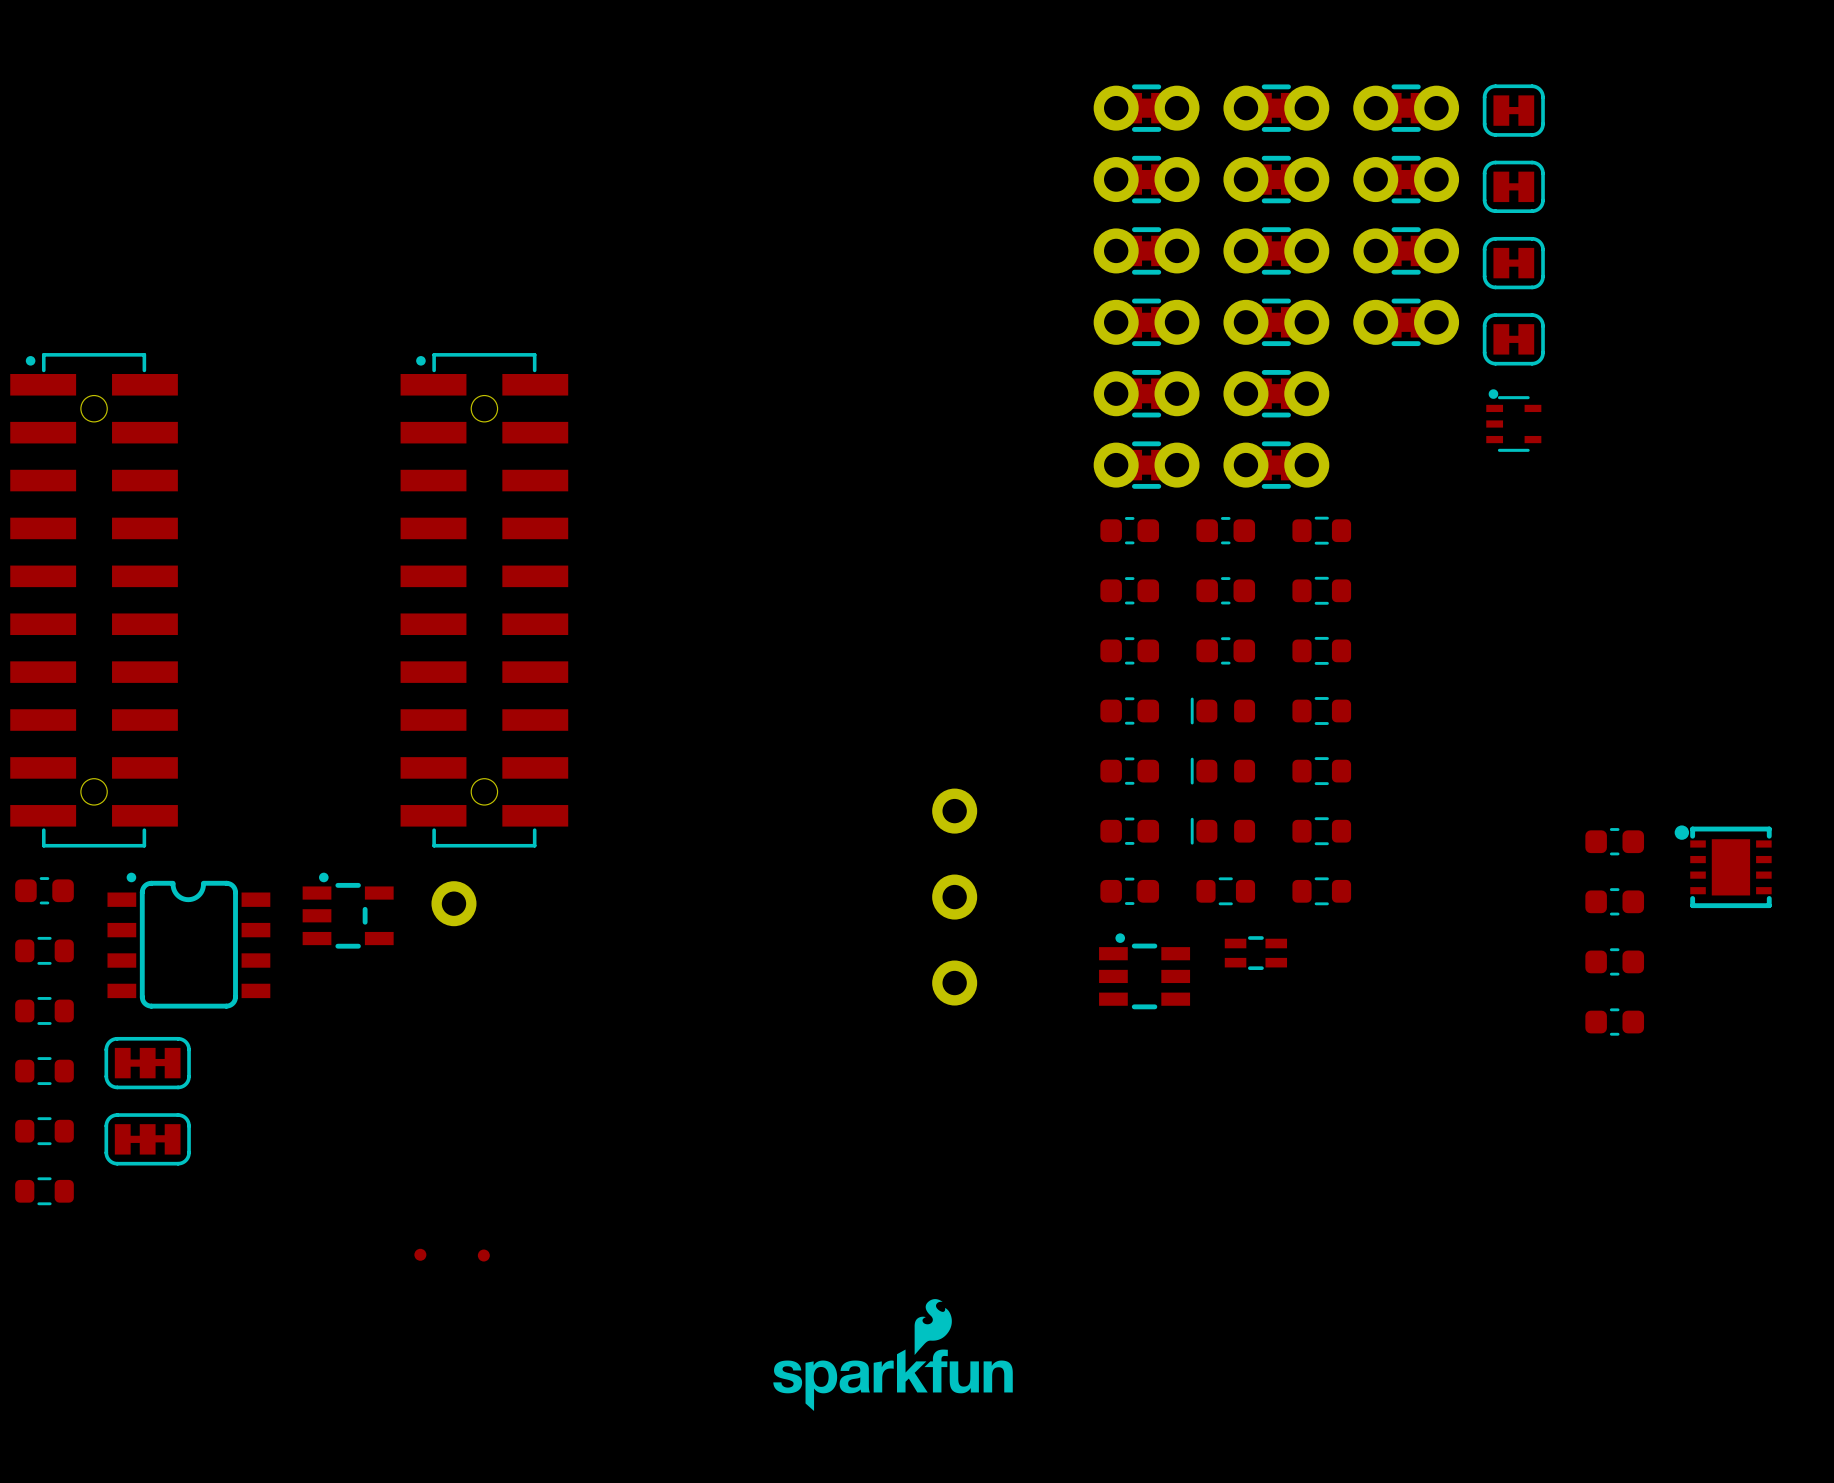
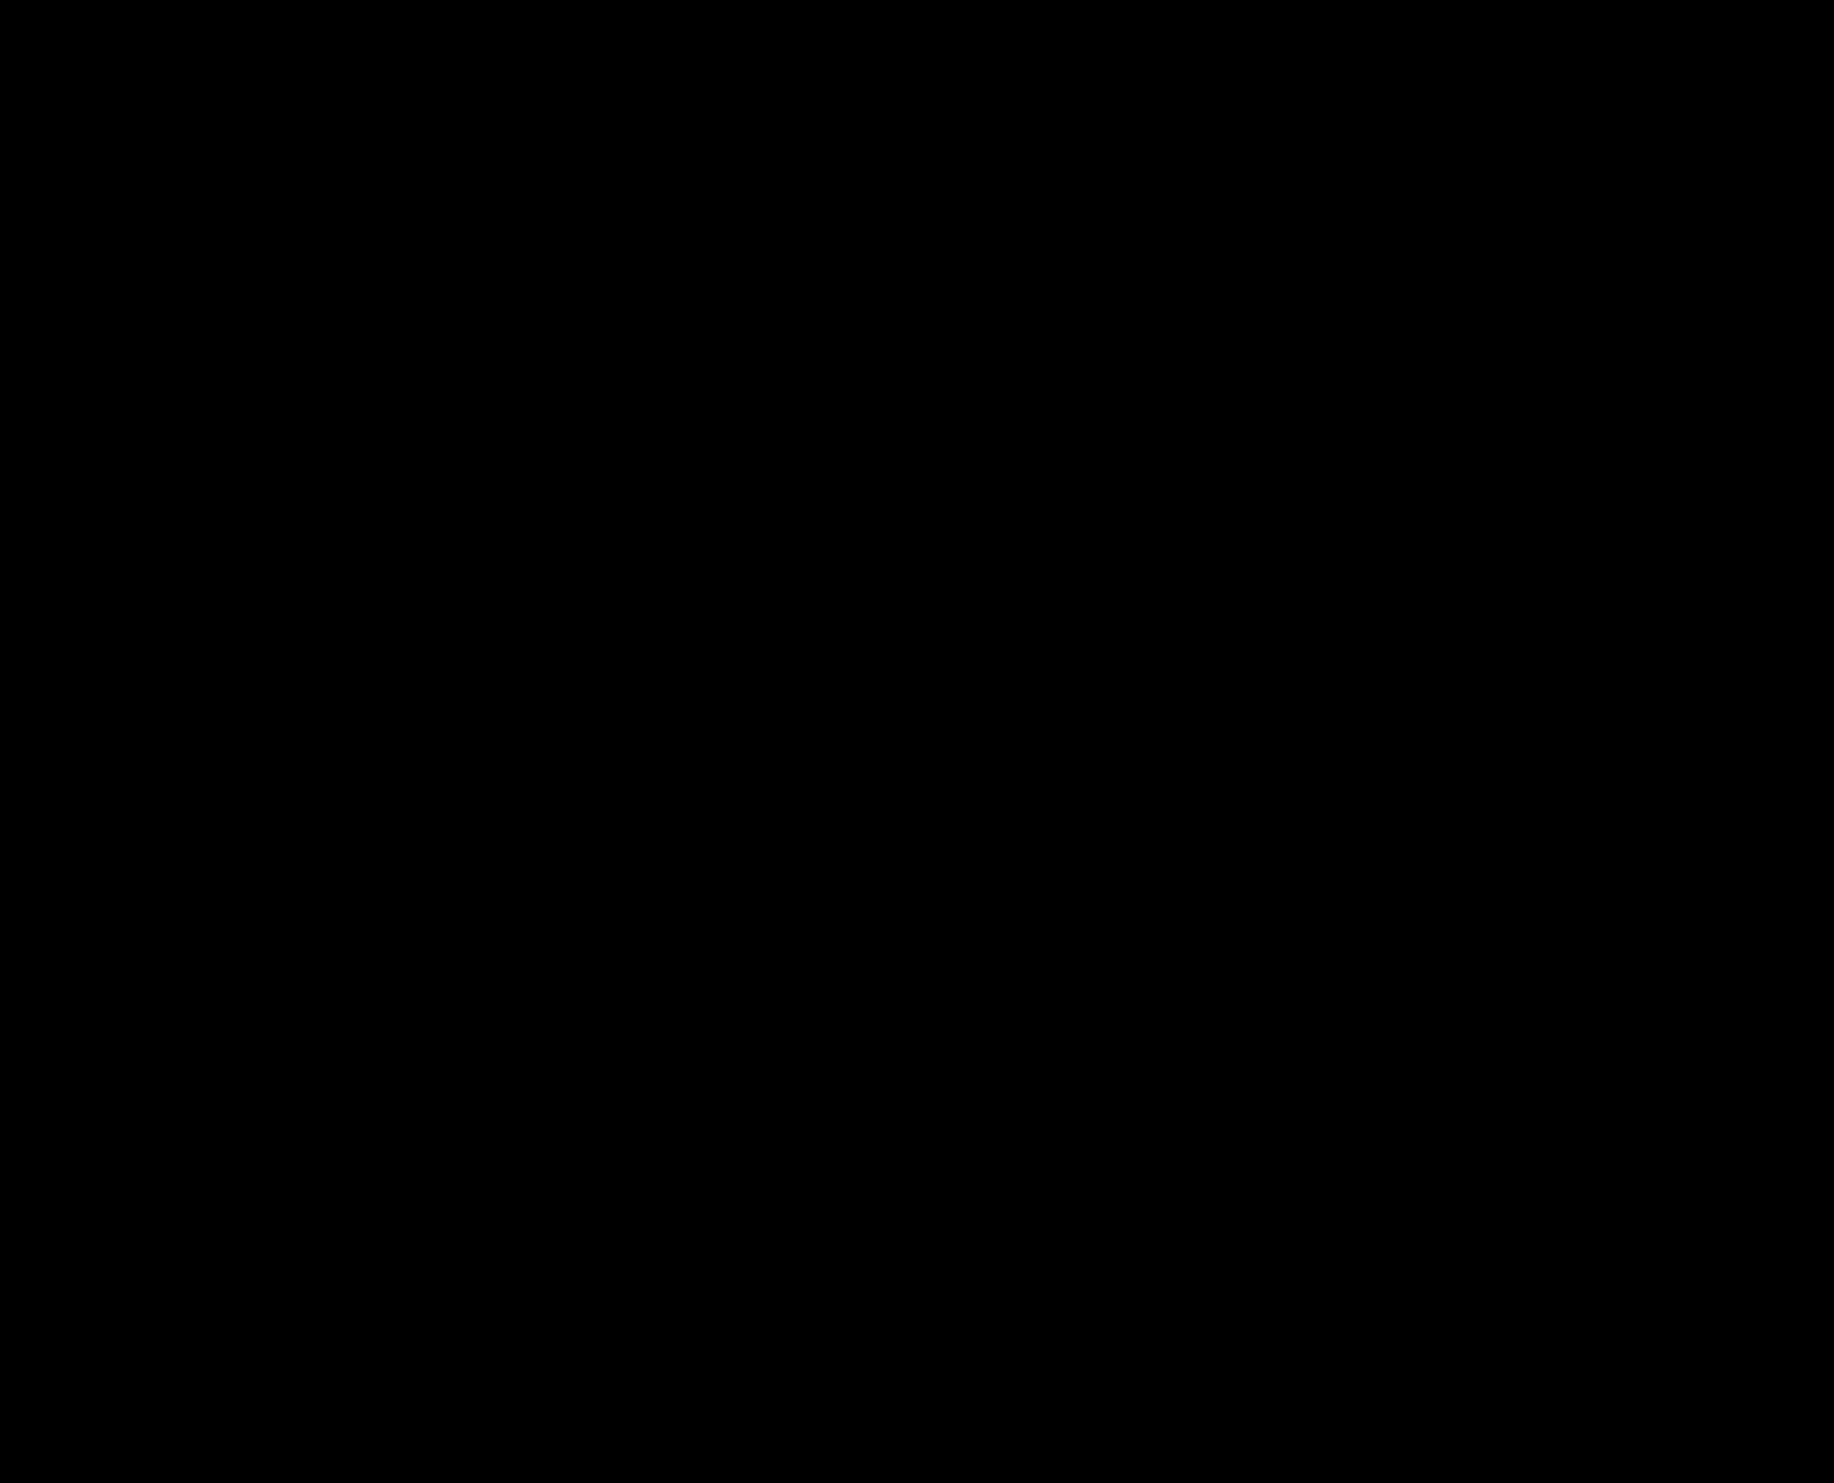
part: (1146, 108) -> none
part: (1276, 108) -> none
part: (1406, 108) -> none
part: (1513, 110) -> none
part: (1146, 179) -> none
part: (1276, 179) -> none
part: (1406, 179) -> none
part: (1513, 186) -> none
part: (1146, 250) -> none
part: (1276, 250) -> none
part: (1406, 250) -> none
part: (1513, 263) -> none
part: (1146, 322) -> none
part: (1276, 322) -> none
part: (1406, 322) -> none
part: (1513, 339) -> none
part: (1146, 393) -> none
part: (1276, 393) -> none
part: (1513, 420) -> none
part: (1146, 465) -> none
part: (1276, 465) -> none
part: (1129, 530) -> none
part: (1225, 530) -> none
part: (1321, 530) -> none
part: (1129, 590) -> none
part: (1225, 590) -> none
part: (1321, 590) -> none
part: (94, 600) -> none
part: (484, 600) -> none
part: (1129, 650) -> none
part: (1225, 650) -> none
part: (1321, 650) -> none
part: (1129, 710) -> none
part: (1222, 710) -> none
part: (1321, 710) -> none
part: (1129, 771) -> none
part: (1222, 771) -> none
part: (1321, 771) -> none
part: (954, 811) -> none
part: (1129, 831) -> none
part: (1222, 831) -> none
part: (1321, 831) -> none
part: (1614, 841) -> none
part: (1723, 866) -> none
part: (44, 890) -> none
part: (1129, 891) -> none
part: (1225, 891) -> none
part: (1321, 891) -> none
part: (954, 897) -> none
part: (1614, 901) -> none
part: (453, 903) -> none
part: (348, 910) -> none
part: (188, 940) -> none
part: (44, 950) -> none
part: (1255, 953) -> none
part: (1614, 961) -> none
part: (1144, 971) -> none
part: (954, 983) -> none
part: (44, 1010) -> none
part: (1614, 1022) -> none
part: (147, 1063) -> none
part: (44, 1071) -> none
part: (44, 1131) -> none
part: (147, 1139) -> none
part: (44, 1191) -> none
part: (420, 1254) -> none
part: (483, 1255) -> none
drawing: [773, 1299, 1013, 1412] -> none

